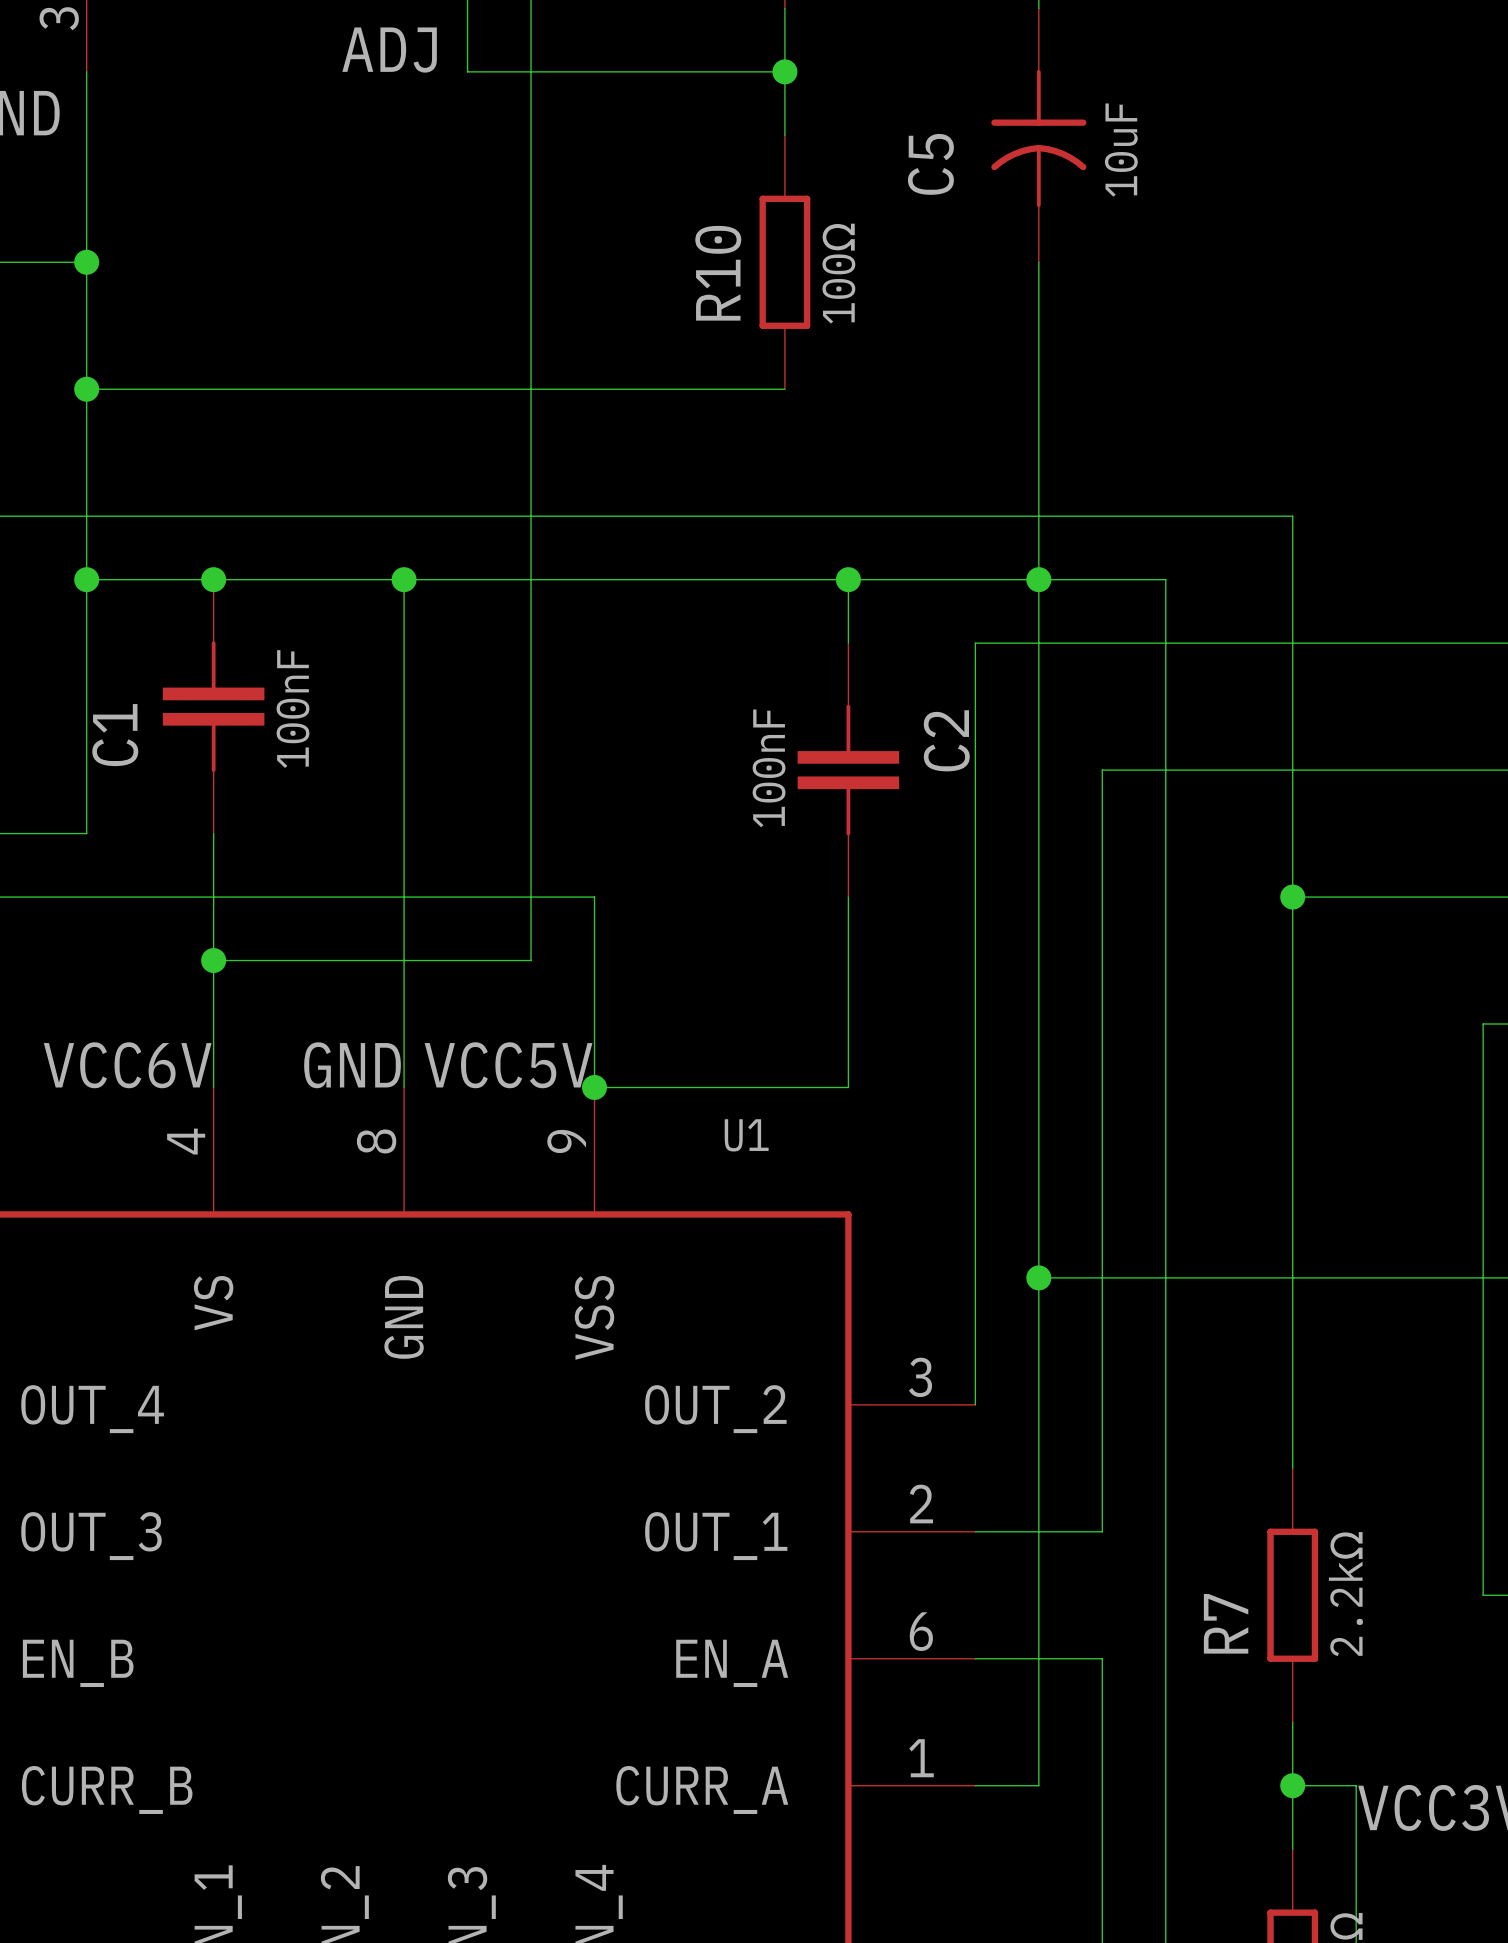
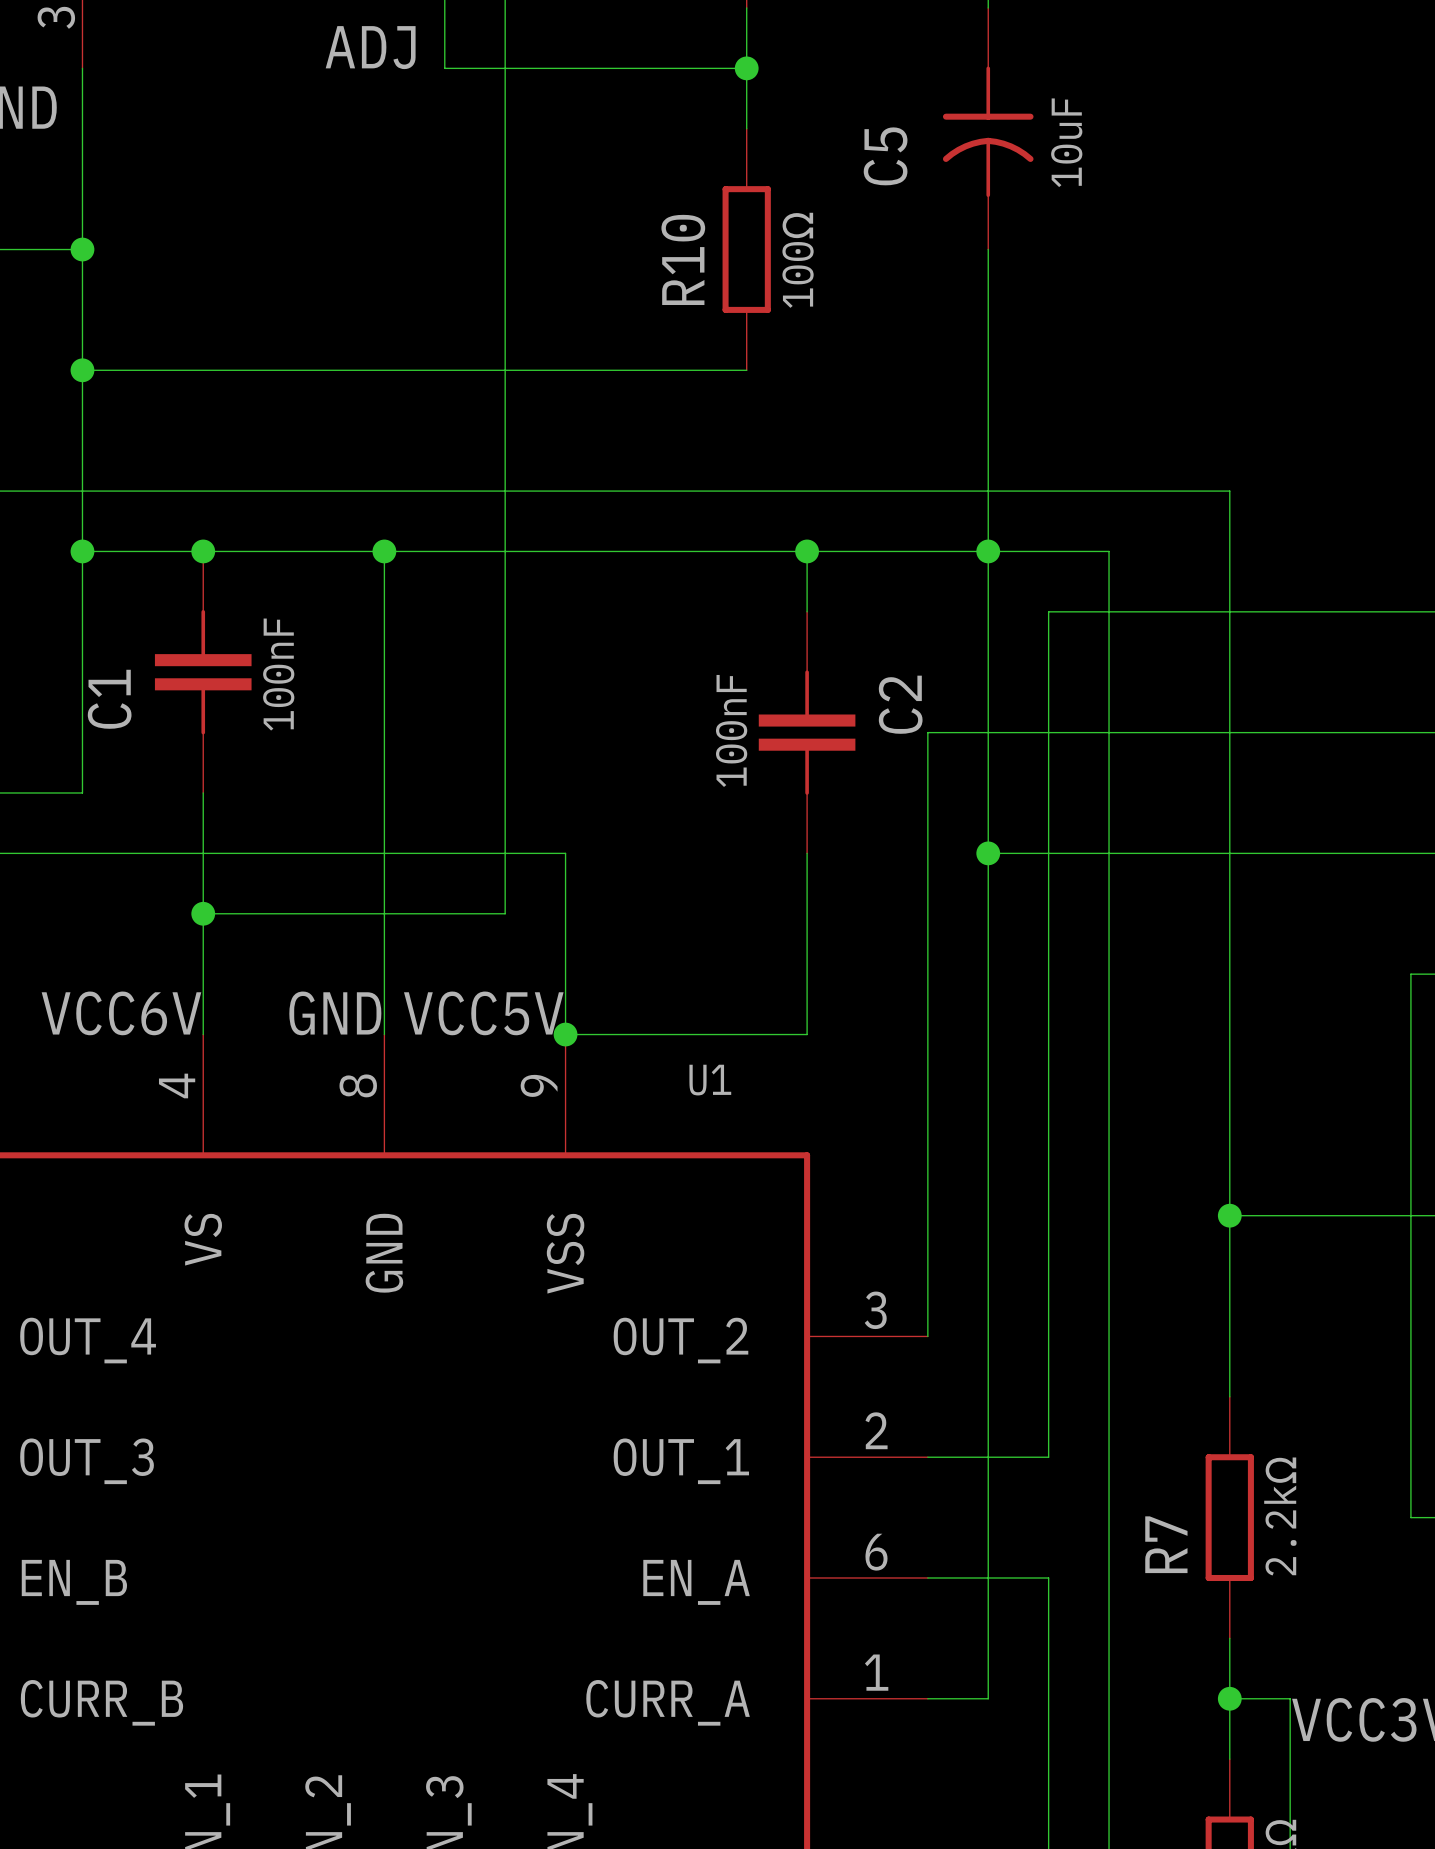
wire: (1102, 643) (975, 643) (975, 770) -> (1048, 611) (1048, 732) (927, 732)
junction: none -> (988, 853)
junction: (1292, 897) -> none
wire: (1038, 1277) (1292, 1277) -> (988, 853) (1229, 853)
junction: (1038, 1277) -> none
junction: none -> (1229, 1215)

